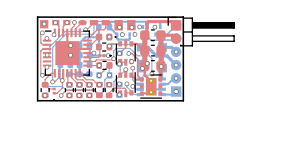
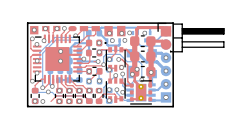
part: (104, 55) -> none
bottom track: (109, 75) (104, 79) (104, 89) (99, 95) -> none
top track: (62, 80) (62, 88) (57, 93) (54, 93) -> none
top track: (45, 84) (49, 88) (54, 88) -> none
via: none -> (48, 91)
part: (54, 94) -> none
via: none -> (42, 101)
via: (61, 95) -> none

